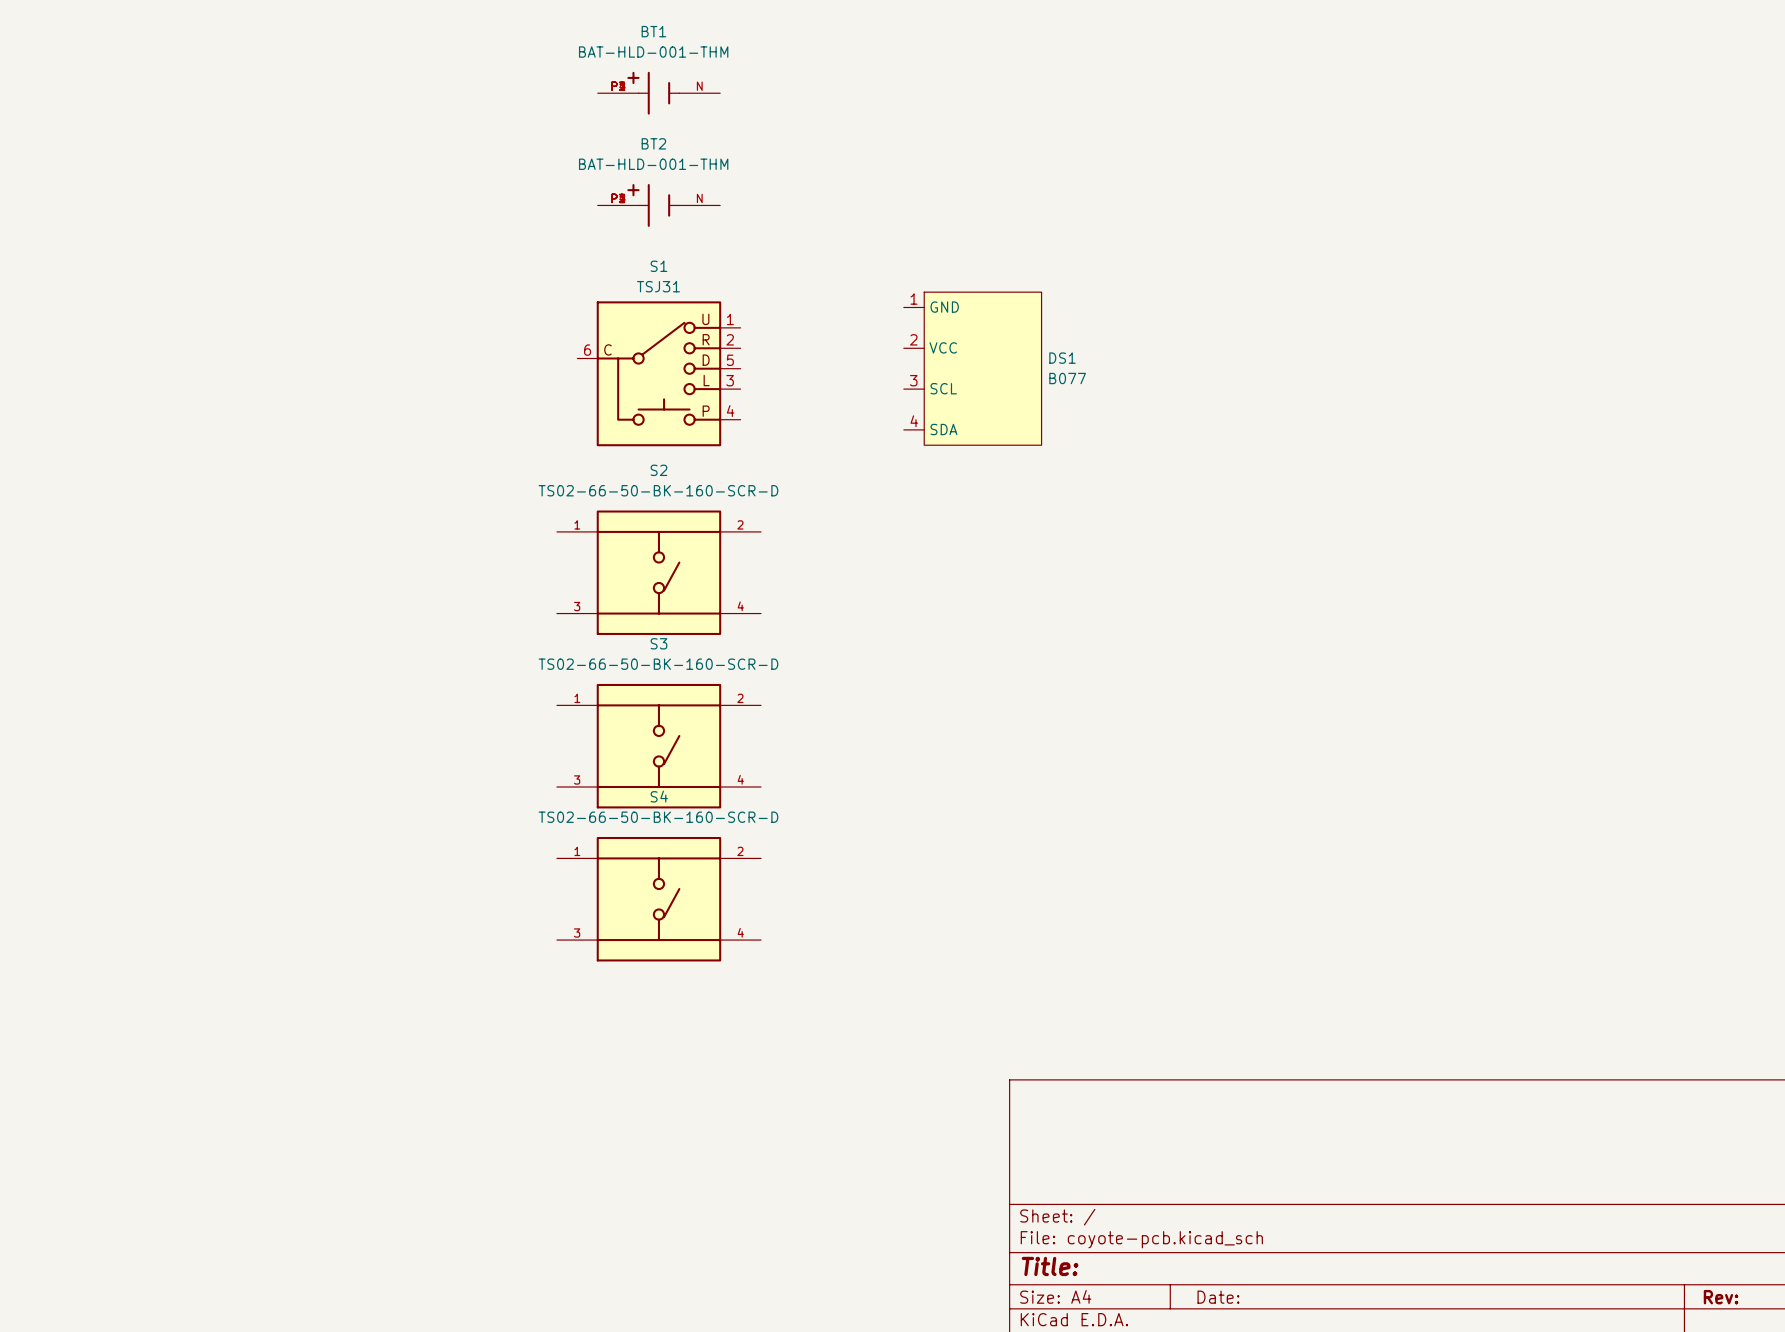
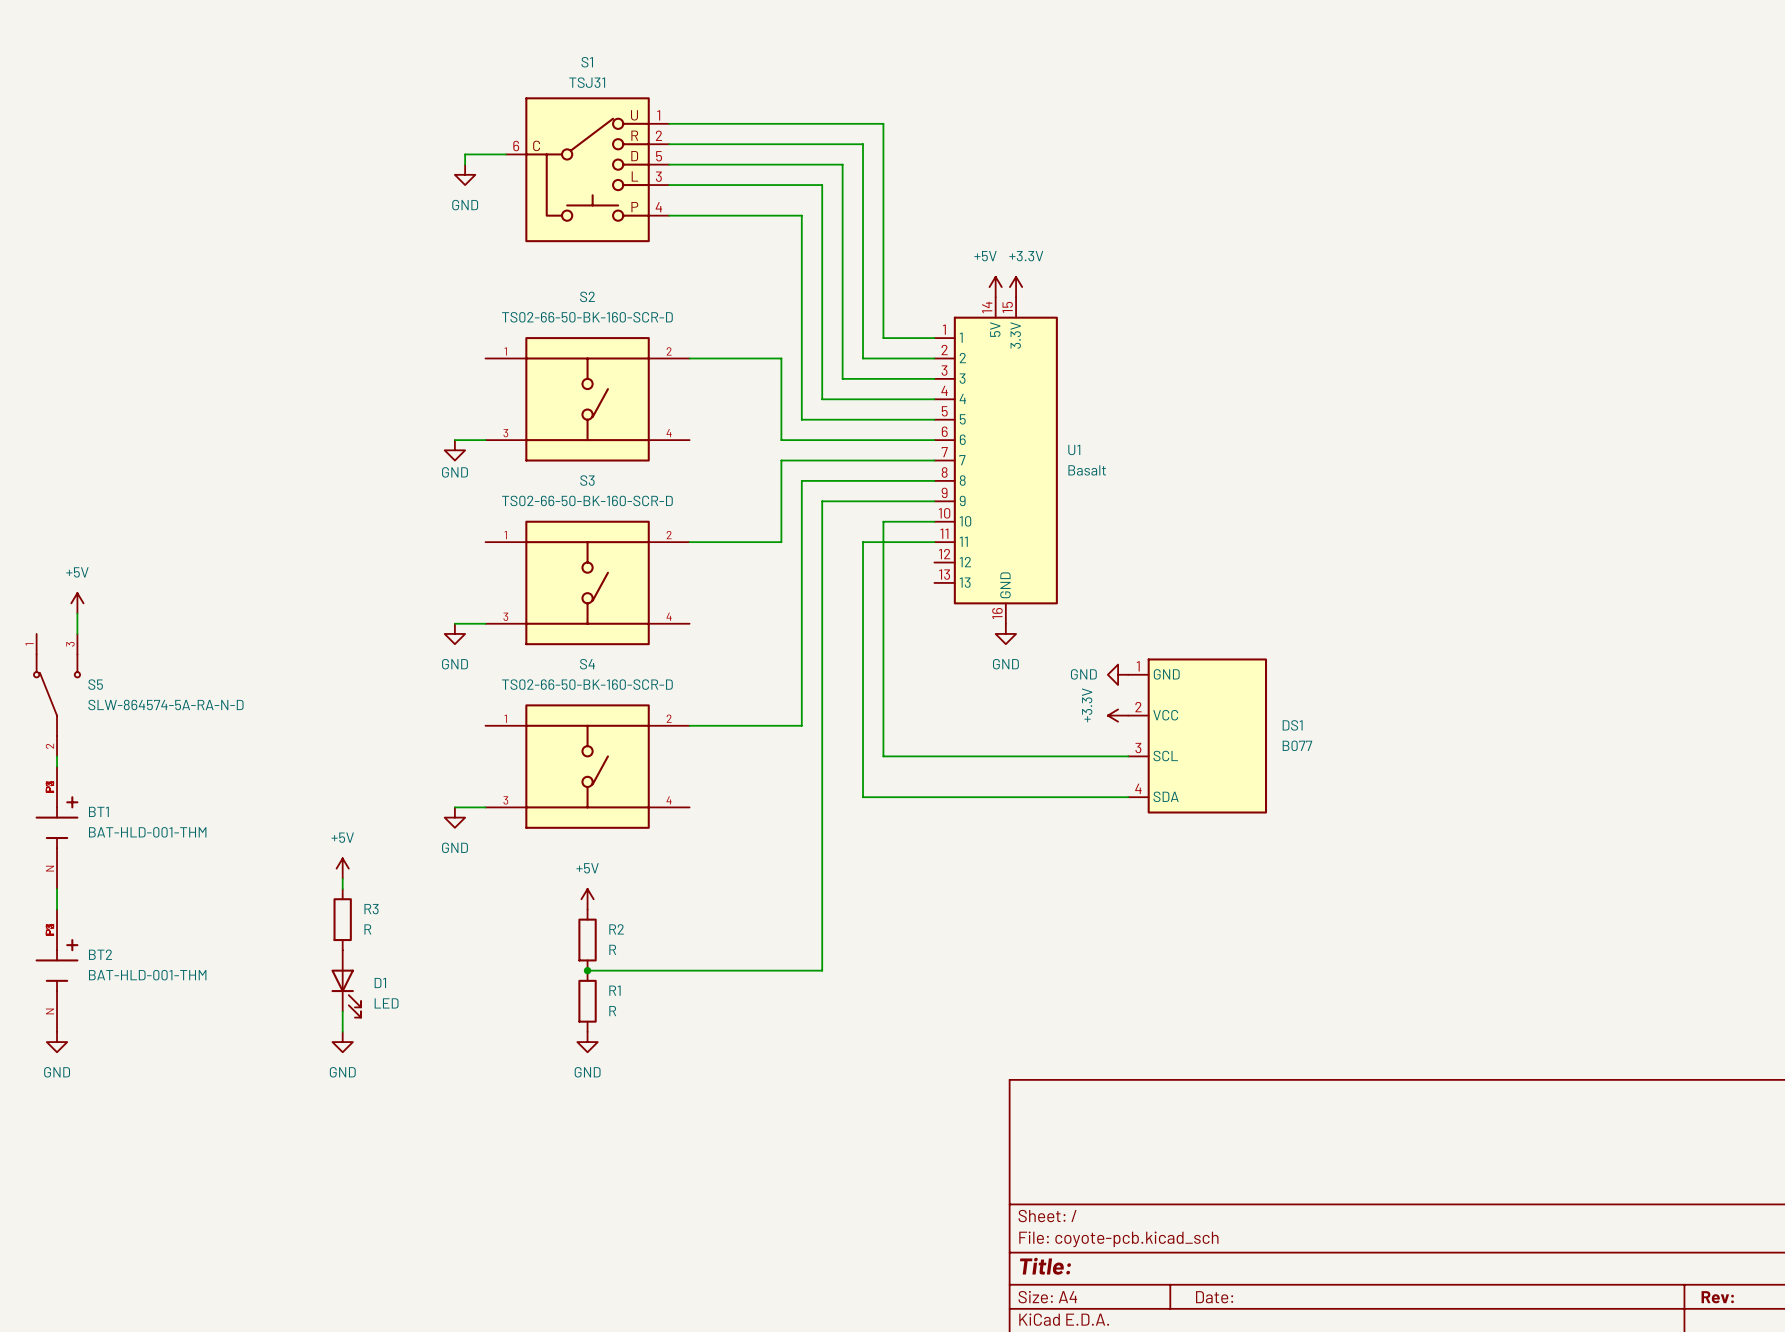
BT1 name position: BT1 (653, 31) -> BT1 (98, 811)
BT1 value position: BAT-HLD-001-THM (653, 52) -> BAT-HLD-001-THM (147, 832)
BT1 rotation: 0° (653, 93) -> 90° clockwise (57, 822)
BT1 position: (658, 93) -> (57, 827)
wire: none -> (669, 123) (883, 123) (883, 338) (934, 338)
BT2 name position: BT2 (653, 143) -> BT2 (100, 954)
wire: none -> (669, 144) (863, 144) (863, 358) (934, 358)
wire: none -> (505, 154) (465, 154) (465, 164)
BT2 value position: BAT-HLD-001-THM (653, 164) -> BAT-HLD-001-THM (147, 975)
wire: none -> (669, 164) (842, 164) (842, 378) (934, 378)
power symbol: none -> GND (465, 174)
wire: none -> (669, 185) (822, 185) (822, 399) (934, 399)
BT2 rotation: 0° (653, 205) -> 90° clockwise (57, 965)
BT2 position: (658, 205) -> (57, 970)
wire: none -> (669, 215) (801, 215) (801, 419) (934, 419)
power symbol: none -> +5V (995, 287)
power symbol: none -> +3.3V (1016, 287)
DS1 symbol: [903, 292, 1042, 446] -> [1128, 658, 1268, 814]
wire: none -> (689, 358) (781, 358) (781, 440) (934, 440)
S1 position: (658, 373) -> (587, 169)
wire: none -> (454, 440) (485, 440)
power symbol: none -> GND (454, 450)
wire: none -> (934, 460) (781, 460) (781, 542) (689, 542)
U1: none -> Basalt (996, 460)
wire: none -> (934, 480) (801, 480) (801, 725) (689, 725)
wire: none -> (934, 501) (822, 501) (822, 970) (587, 970)
wire: none -> (934, 521) (883, 521) (883, 756) (1128, 756)
wire: none -> (934, 542) (863, 542) (863, 797) (1128, 797)
S2 position: (658, 572) -> (587, 399)
power symbol: none -> +5V (77, 603)
wire: none -> (77, 613) (77, 633)
wire: none -> (454, 623) (485, 623)
power symbol: none -> GND (454, 633)
power symbol: none -> GND (1005, 633)
power symbol: none -> GND (1118, 674)
S5: none -> SLW-864574-5A-RA-N-D (57, 695)
power symbol: none -> +3.3V (1118, 715)
S3 position: (658, 746) -> (587, 582)
wire: none -> (57, 756) (57, 766)
wire: none -> (454, 807) (485, 807)
power symbol: none -> GND (454, 817)
power symbol: none -> +5V (342, 868)
wire: none -> (342, 878) (342, 889)
wire: none -> (57, 889) (57, 909)
power symbol: none -> +5V (587, 899)
S4 position: (658, 899) -> (587, 766)
R3: none -> R (342, 919)
R2: none -> R (587, 940)
junction: none -> (587, 970)
D1: none -> LED (346, 983)
R1: none -> R (587, 1001)
wire: none -> (342, 1011) (342, 1031)
power symbol: none -> GND (57, 1042)
power symbol: none -> GND (342, 1042)
power symbol: none -> GND (587, 1042)

